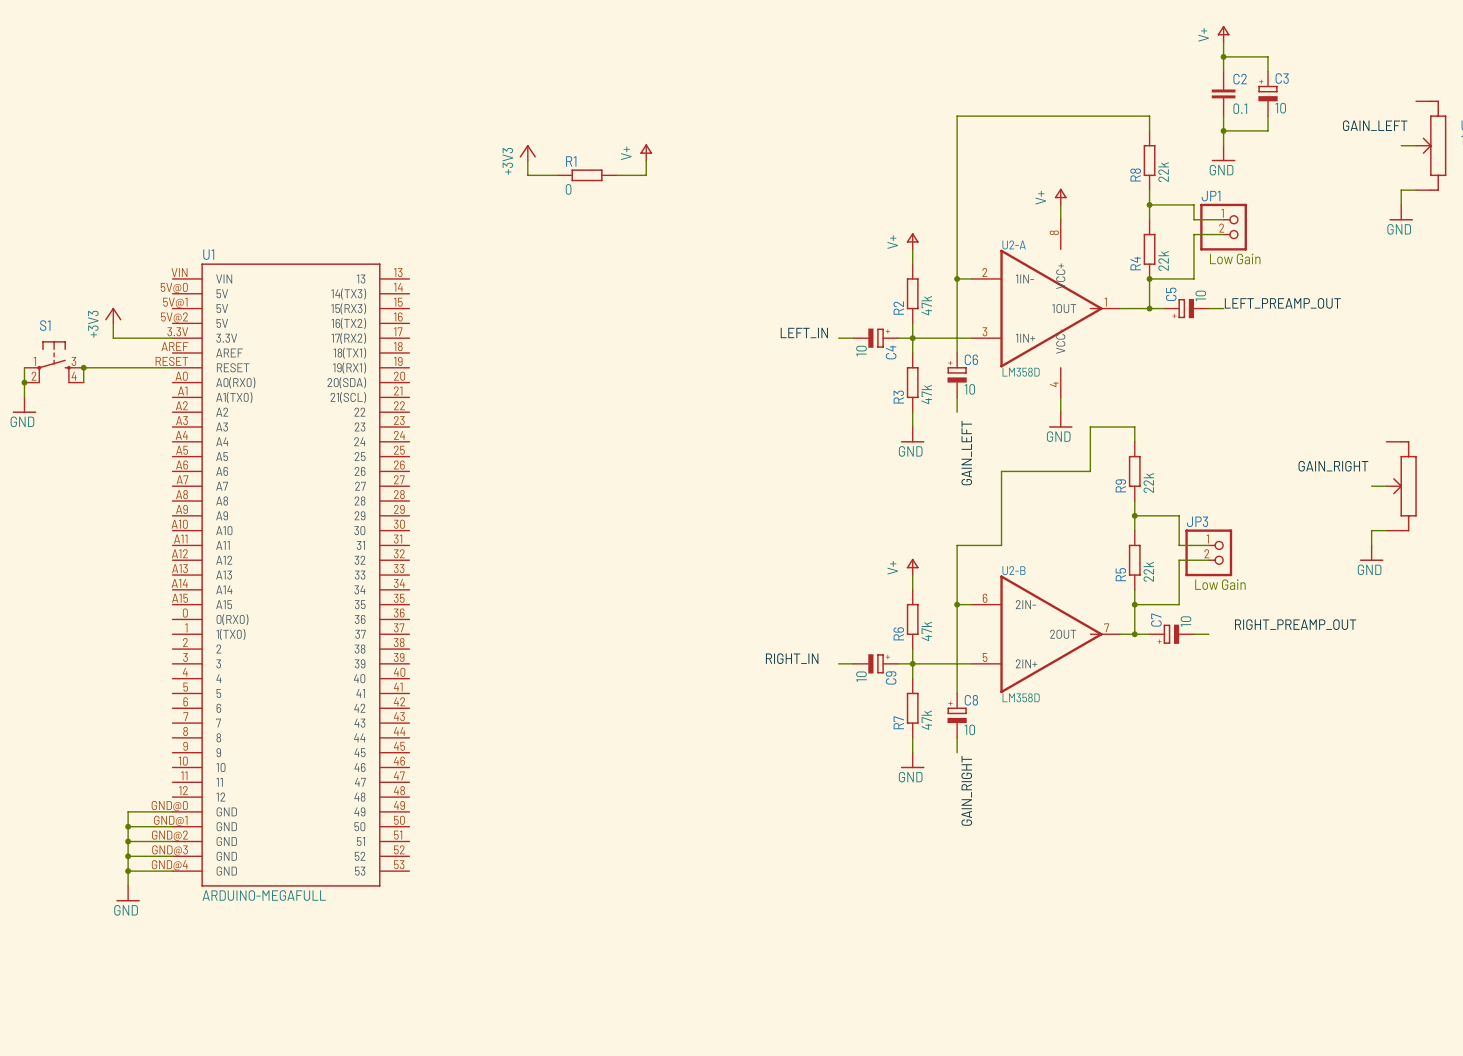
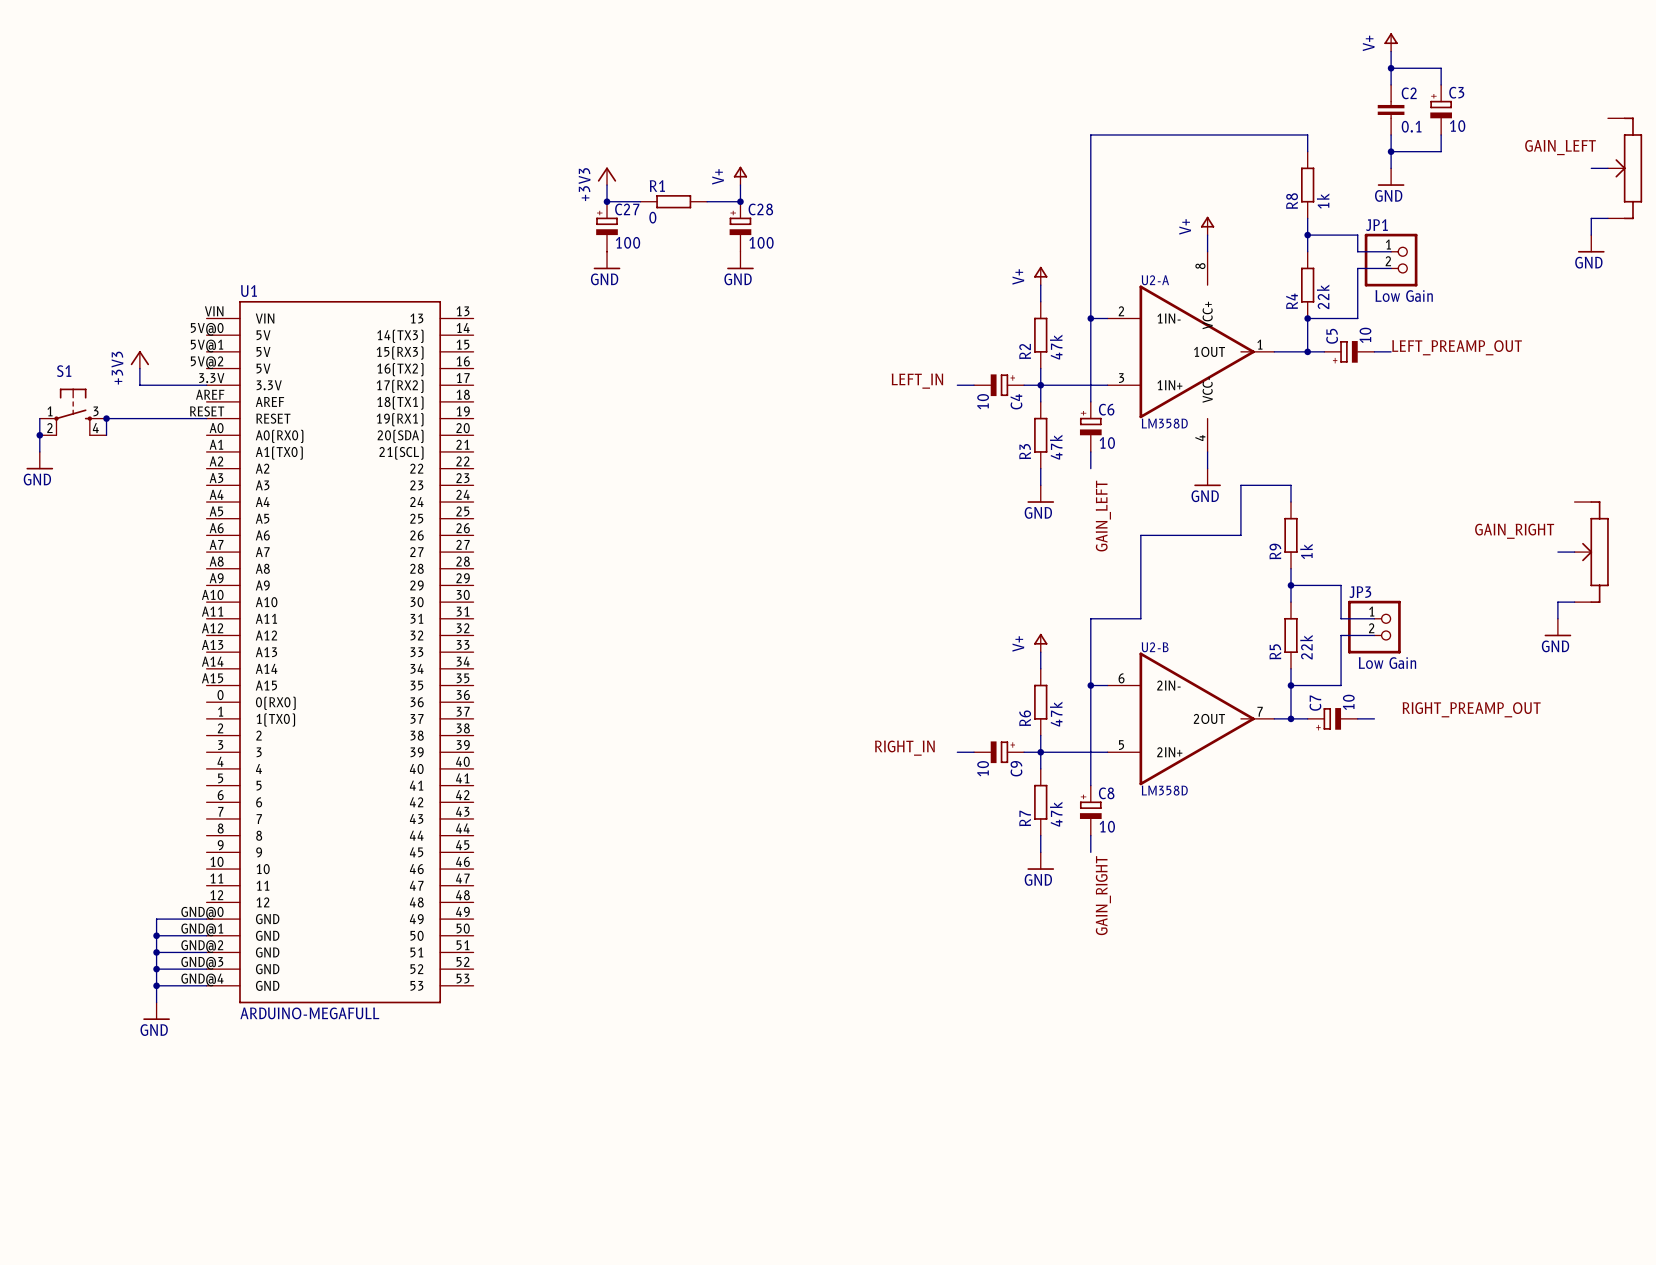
R8 value: 22k (1163, 172) -> 1k (1323, 201)
junction: none -> (607, 201)
junction: none -> (740, 201)
C27: none -> 100 (607, 226)
C28: none -> 100 (740, 226)
power symbol: none -> GND (607, 260)
power symbol: none -> GND (740, 260)
R9 value: 22k (1148, 482) -> 1k (1306, 551)

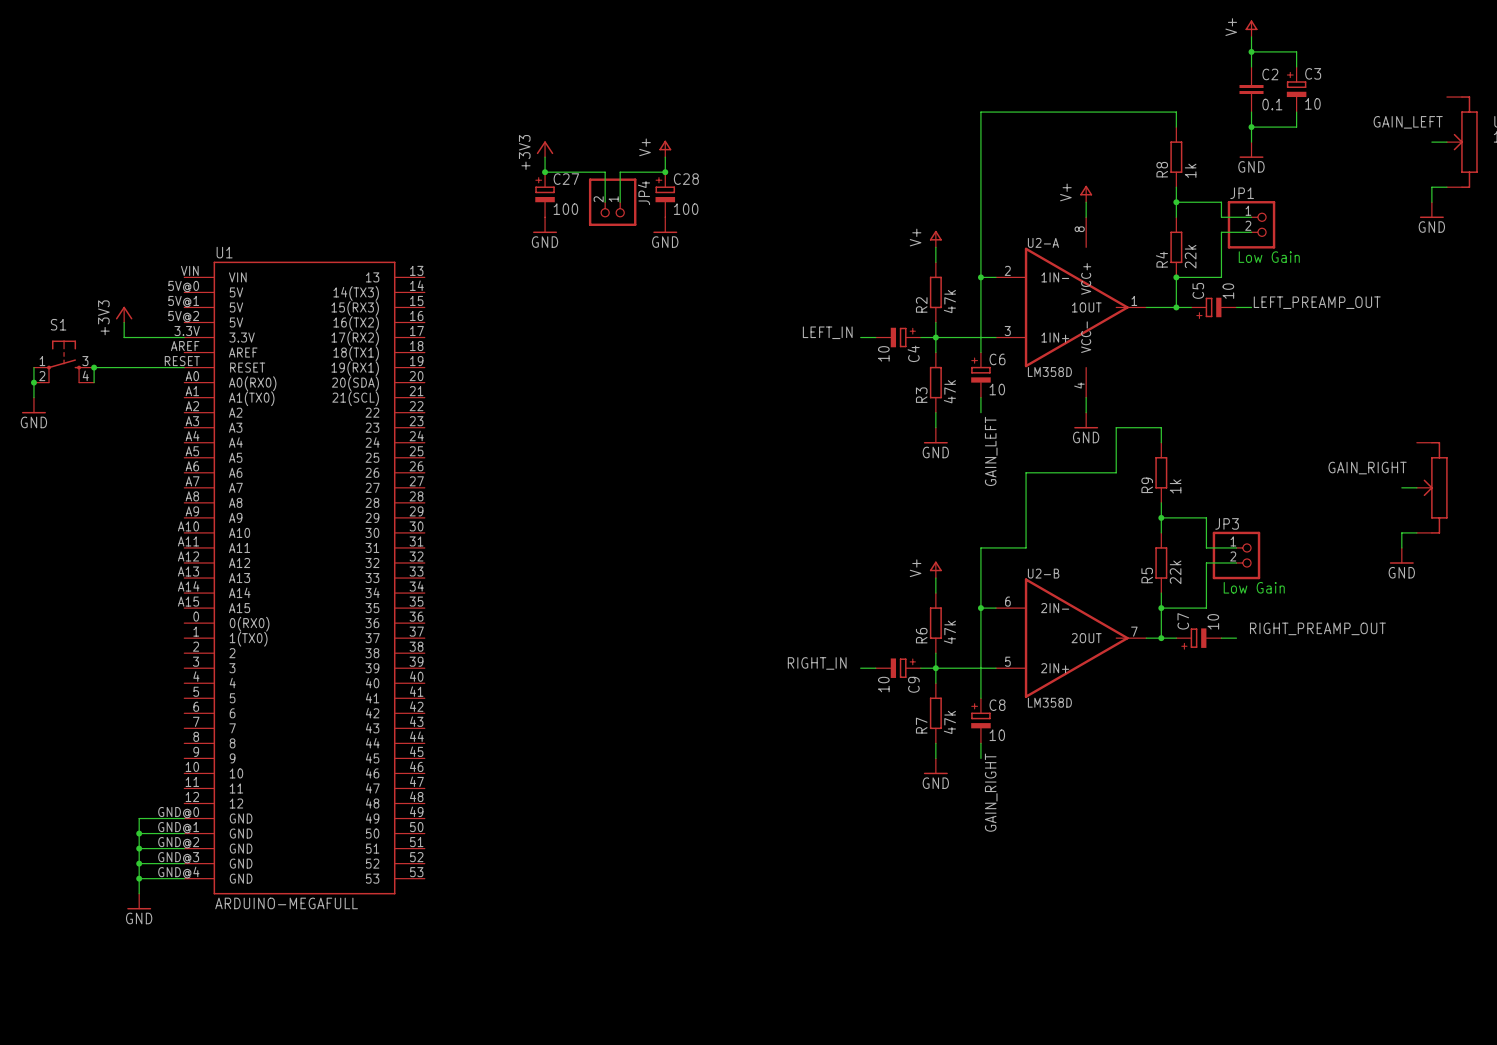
wire: none -> (575, 172) (605, 172) (605, 202)
R1: 0 (673, 201) -> none
wire: none -> (635, 172) (620, 172) (620, 202)
JP4: none -> (612, 202)

